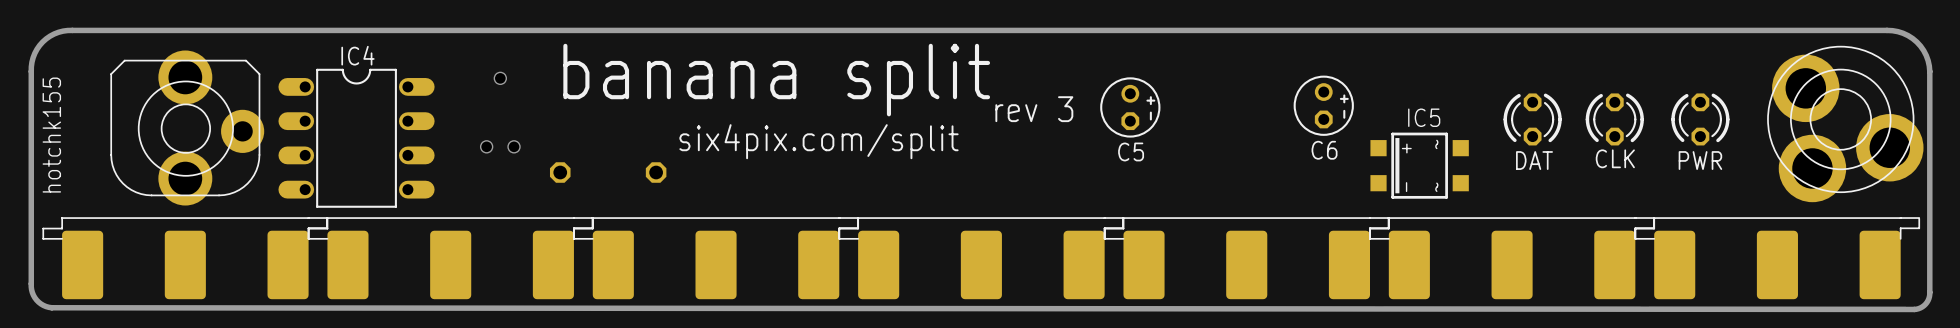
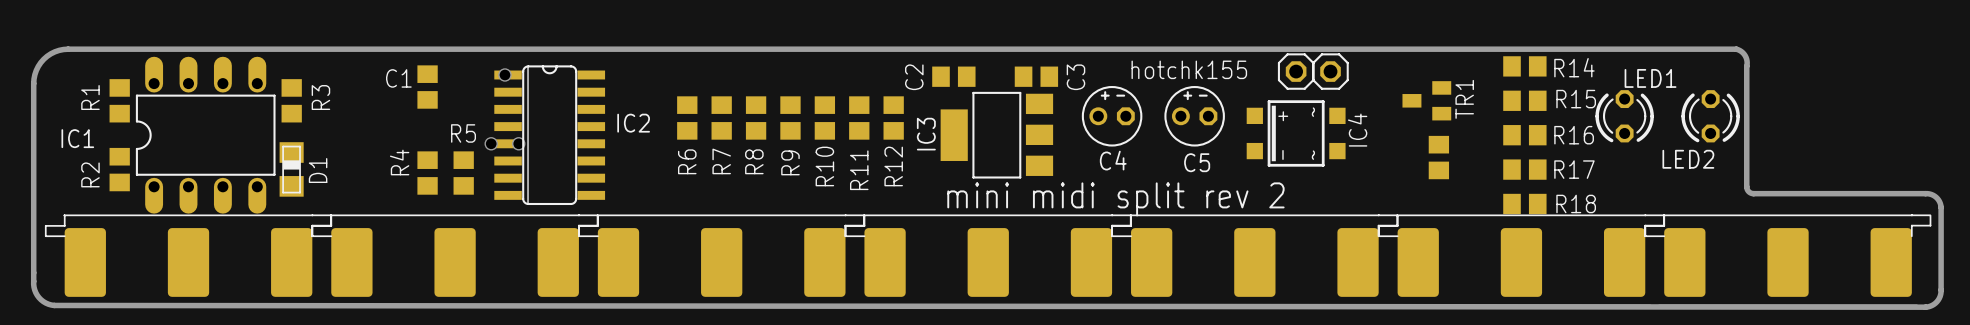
IC4 name position: IC4 (357, 55) -> IC4 (1357, 130)
IC4 footprint: [278, 68, 435, 208] -> [1246, 100, 1346, 167]
R14: none -> (1524, 66)
text: none -> hotchk155 (1189, 69)
part: none -> (1296, 71)
part: none -> (1330, 71)
text: banana split (776, 80) -> none
C2: none -> (953, 76)
C3: none -> (1036, 76)
board edge: (31, 86) (31, 62) (37, 49) (50, 36) (67, 30) (1892, 30) (1903, 33) (1916, 42) (1926, 55) (1929, 66) (1929, 210) -> (33, 83) (36, 70) (43, 59) (54, 51) (68, 49) (1736, 49) (1742, 52) (1747, 60) (1746, 186) (1749, 192) (1927, 193) (1937, 198) (1941, 207)
C1: none -> (427, 87)
R1: none -> (119, 100)
R3: none -> (291, 100)
TR1: none -> (1426, 100)
R15: none -> (1524, 100)
C6: (1323, 105) -> none
C5 rotation: 0° (1130, 107) -> 90° counterclockwise (1194, 116)
C5 position: (1130, 107) -> (1194, 116)
text: rev 3 (1034, 109) -> none
C4: none -> (1112, 116)
DAT: (1532, 119) -> none
CLK: (1614, 119) -> none
LED1: none -> (1624, 116)
PWR: (1700, 119) -> none
LED2: none -> (1710, 116)
R6: none -> (687, 117)
R7: none -> (721, 117)
R8: none -> (756, 117)
R9: none -> (790, 117)
R10: none -> (824, 117)
R11: none -> (859, 117)
R12: none -> (893, 117)
part: (1845, 123) -> none
part: (187, 128) -> none
text: hotchk155 (51, 135) -> none
IC1: none -> (205, 135)
IC2: none -> (549, 135)
IC3: none -> (996, 135)
R16: none -> (1524, 135)
text: six4pix.com/split (818, 141) -> none
part: none -> (1438, 157)
IC5: (1419, 165) -> none
R2: none -> (119, 169)
D1: none -> (291, 169)
part: (560, 172) -> none
part: (656, 172) -> none
R17: none -> (1524, 169)
R4: none -> (427, 173)
R5: none -> (463, 173)
text: none -> mini midi split rev 2 (1115, 199)
R18: none -> (1524, 203)

